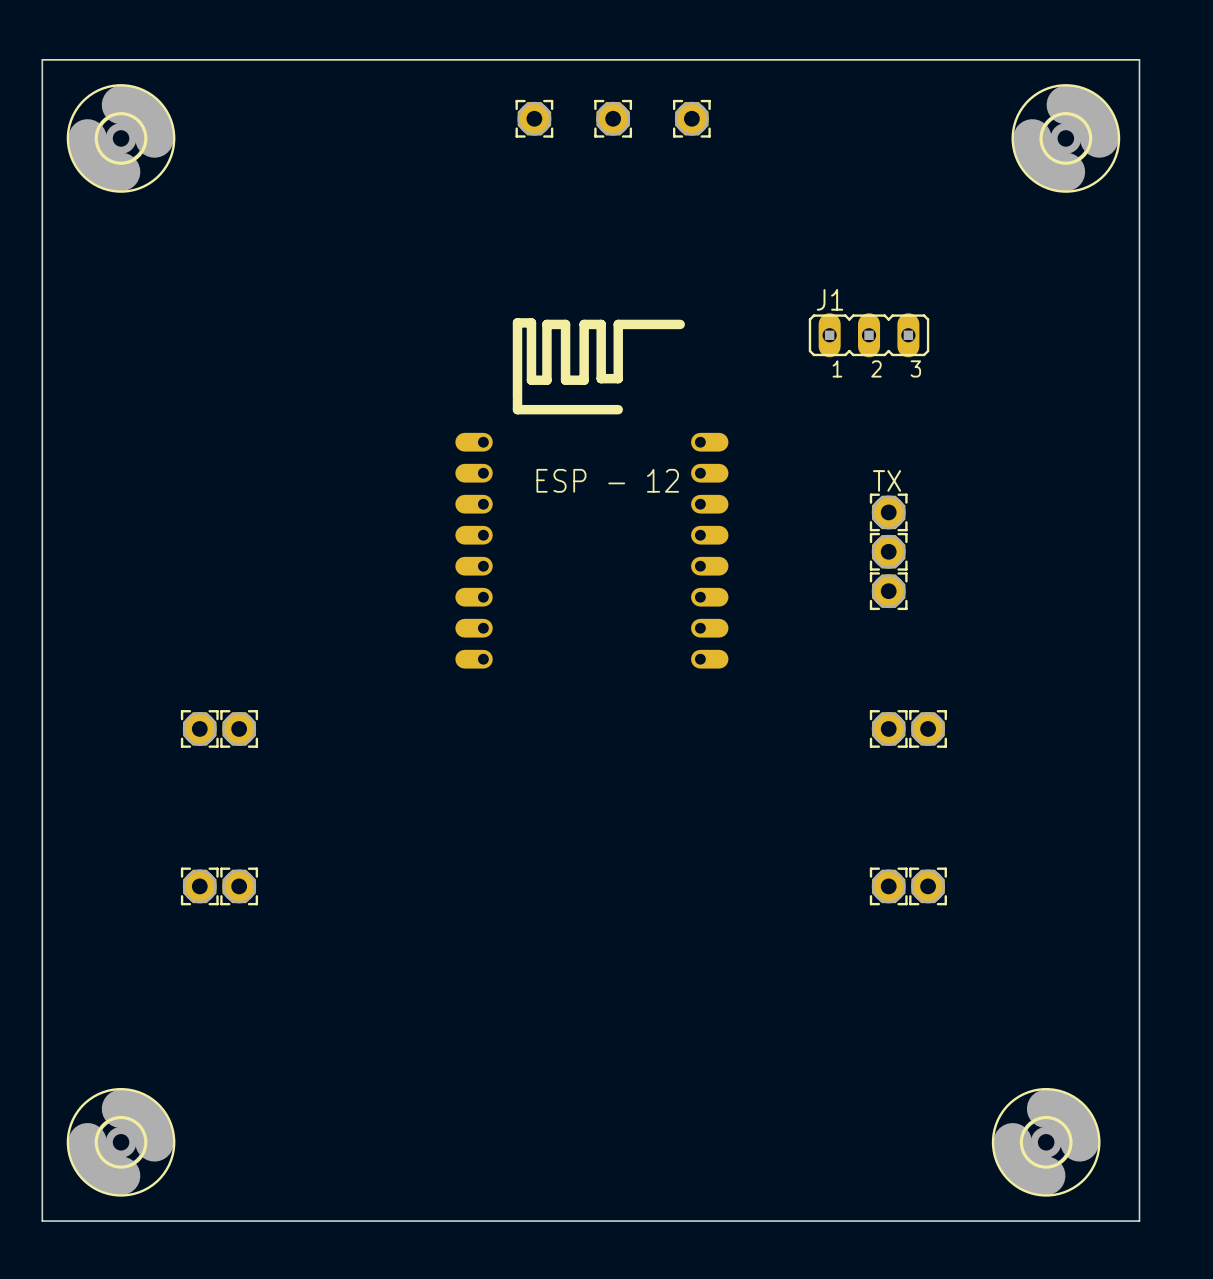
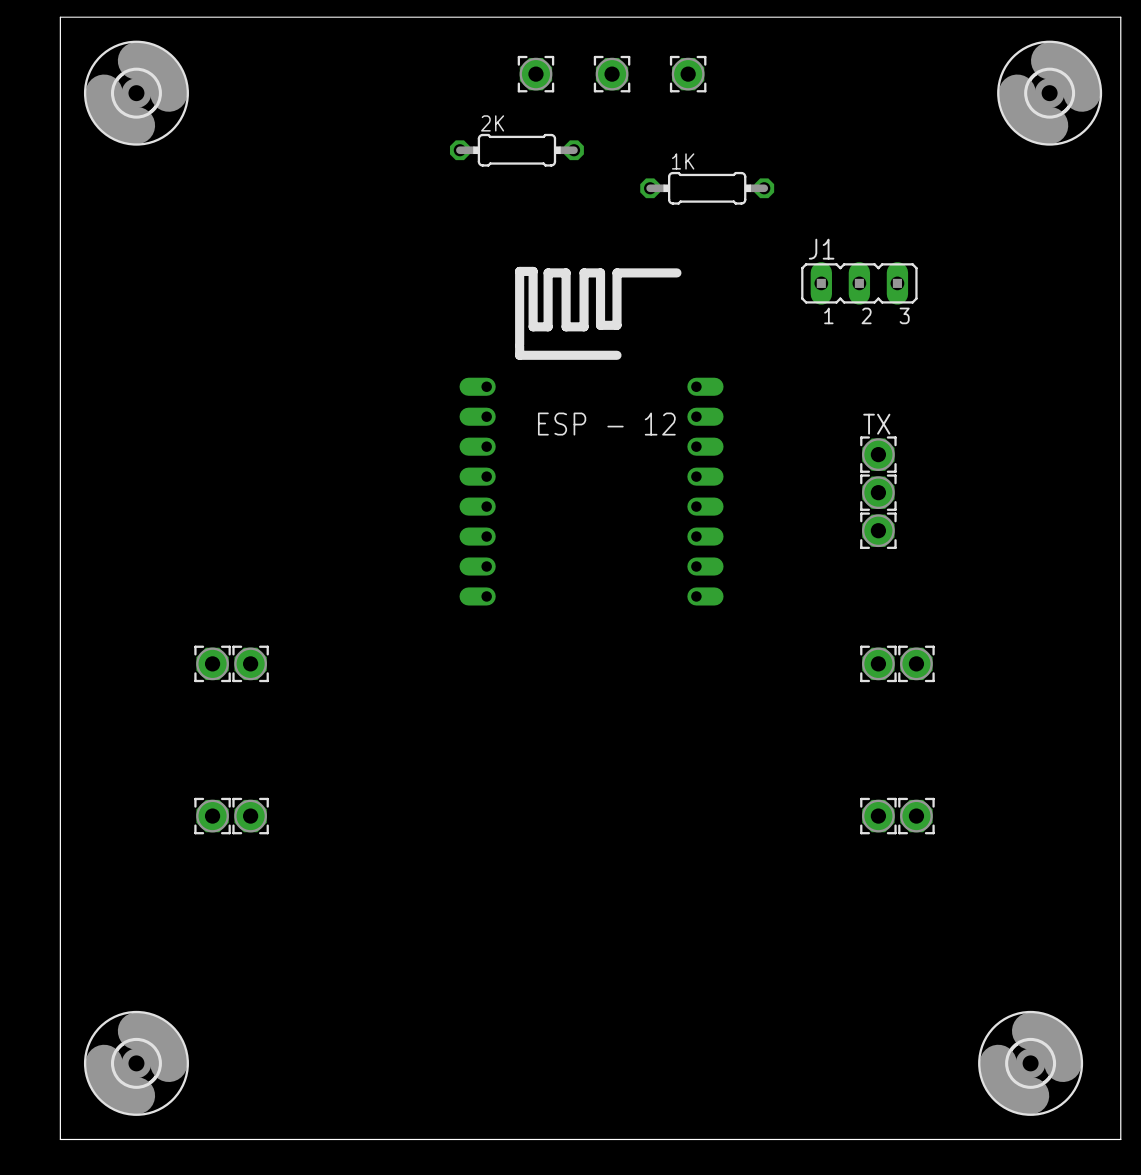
2K: none -> (516, 150)
1K: none -> (707, 188)

